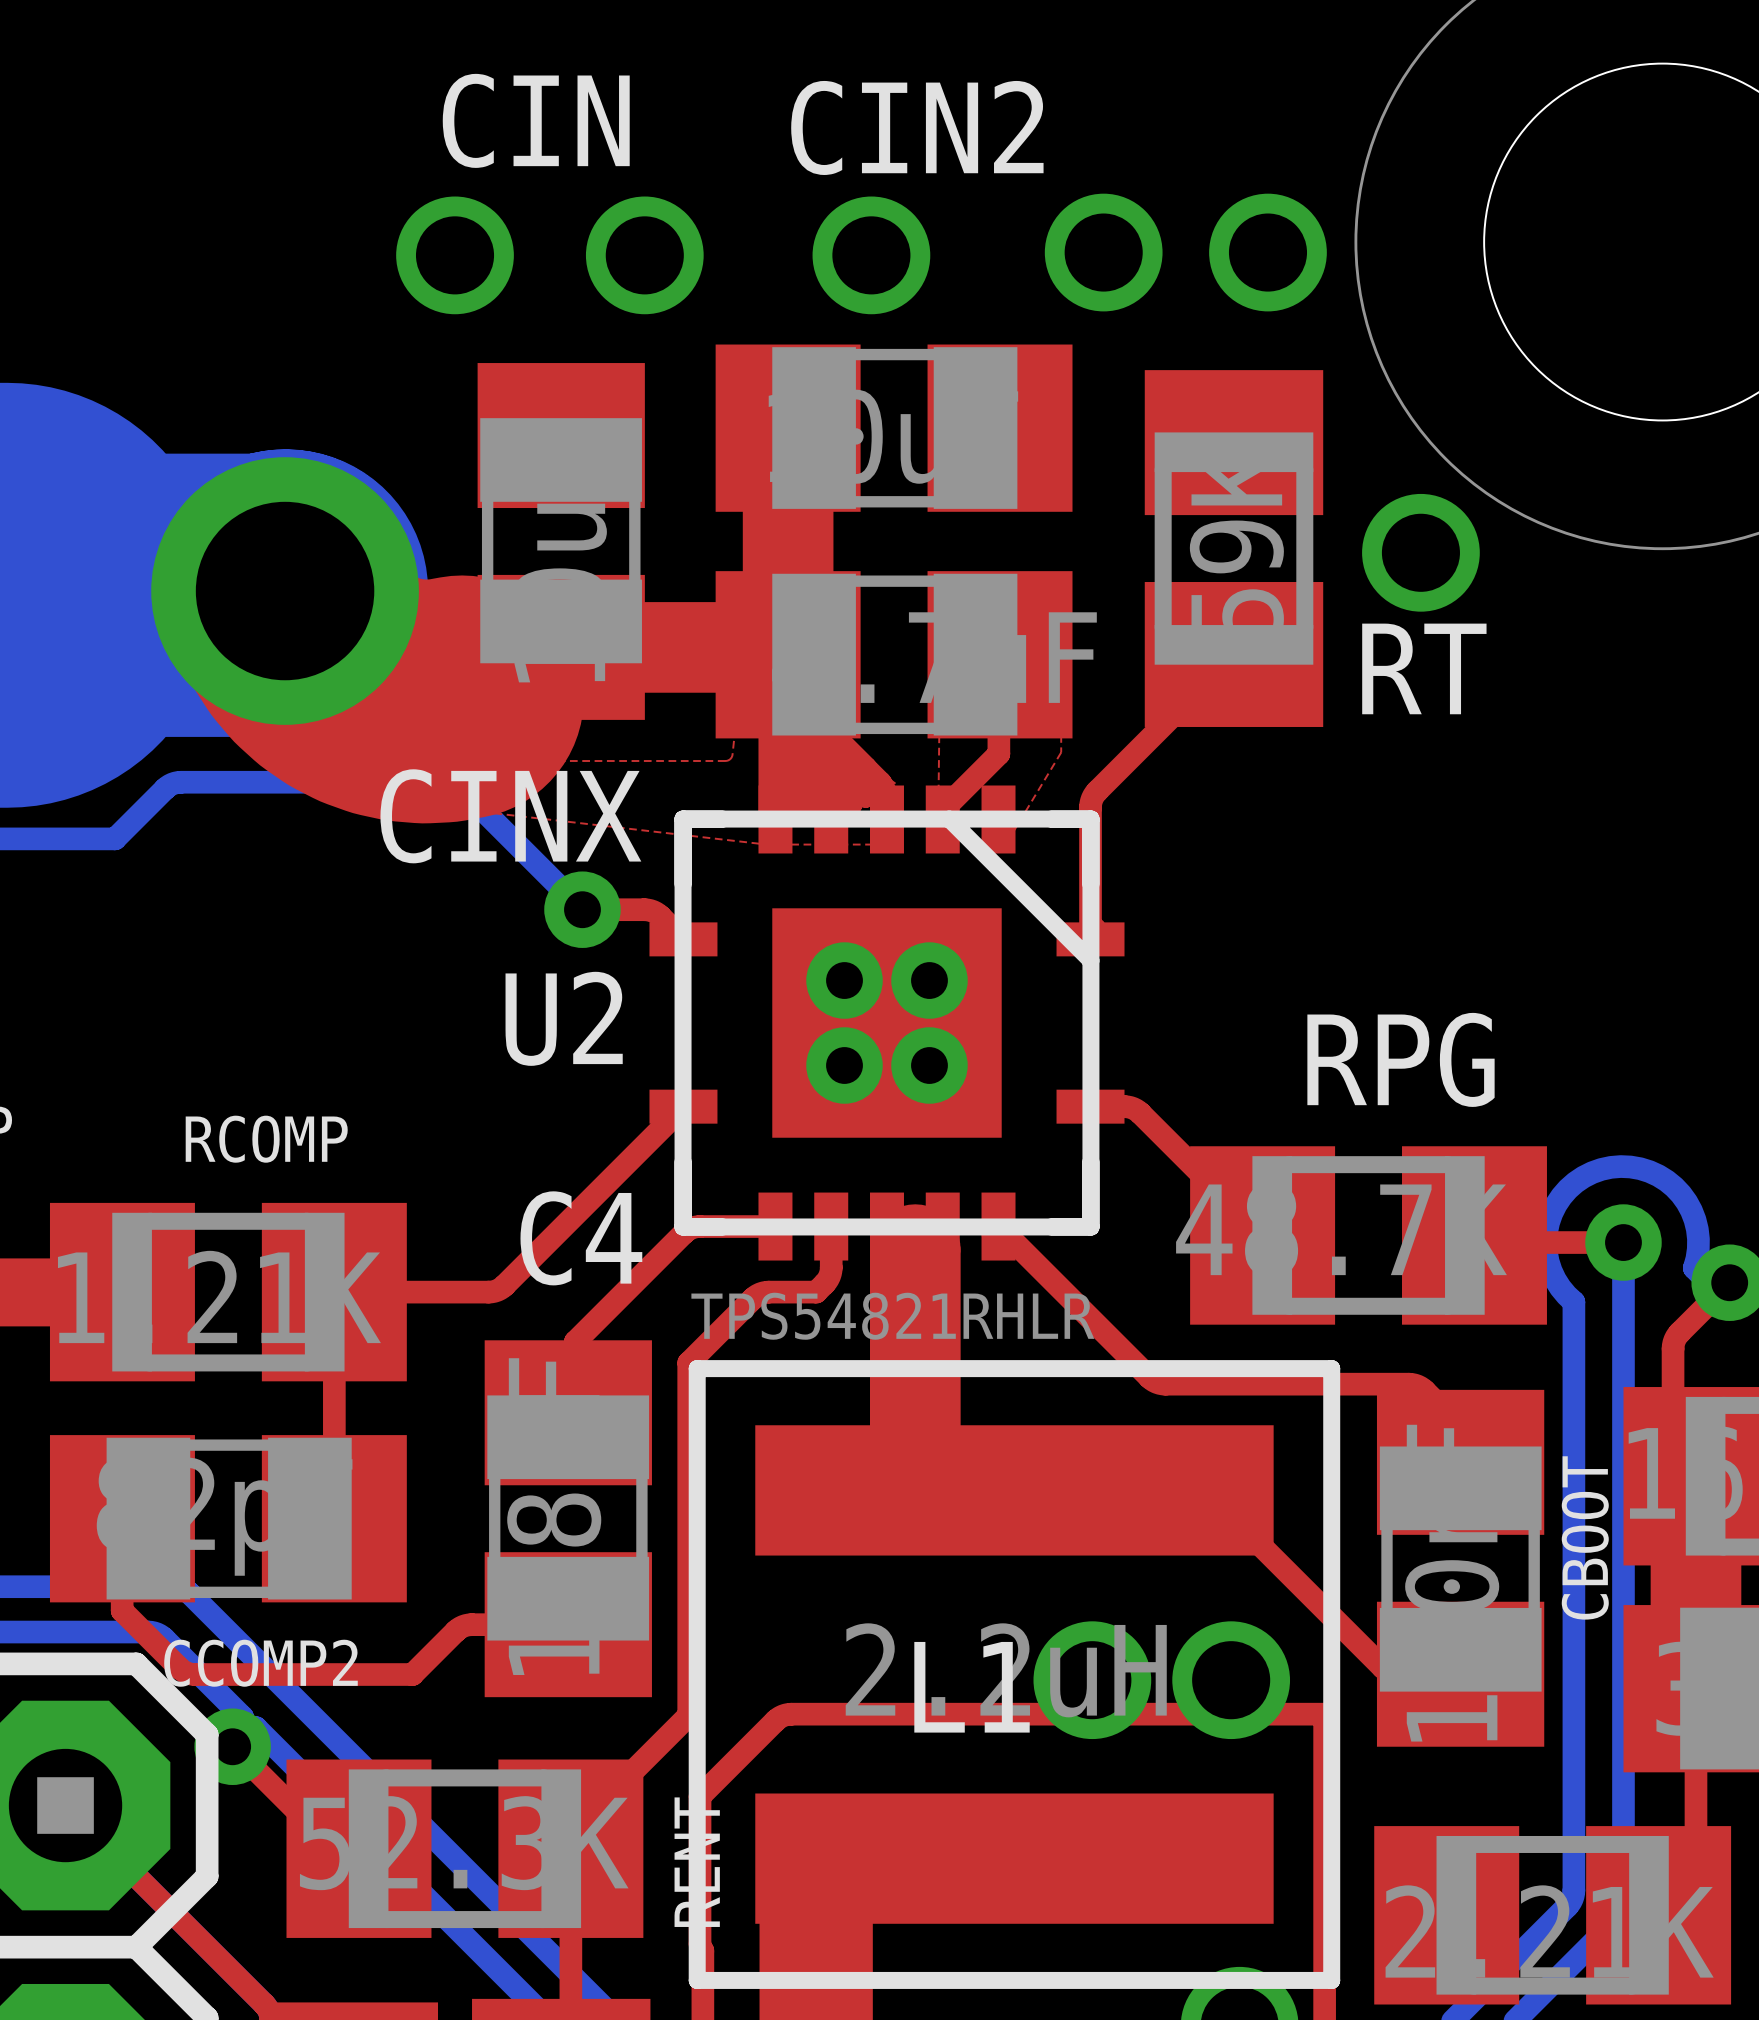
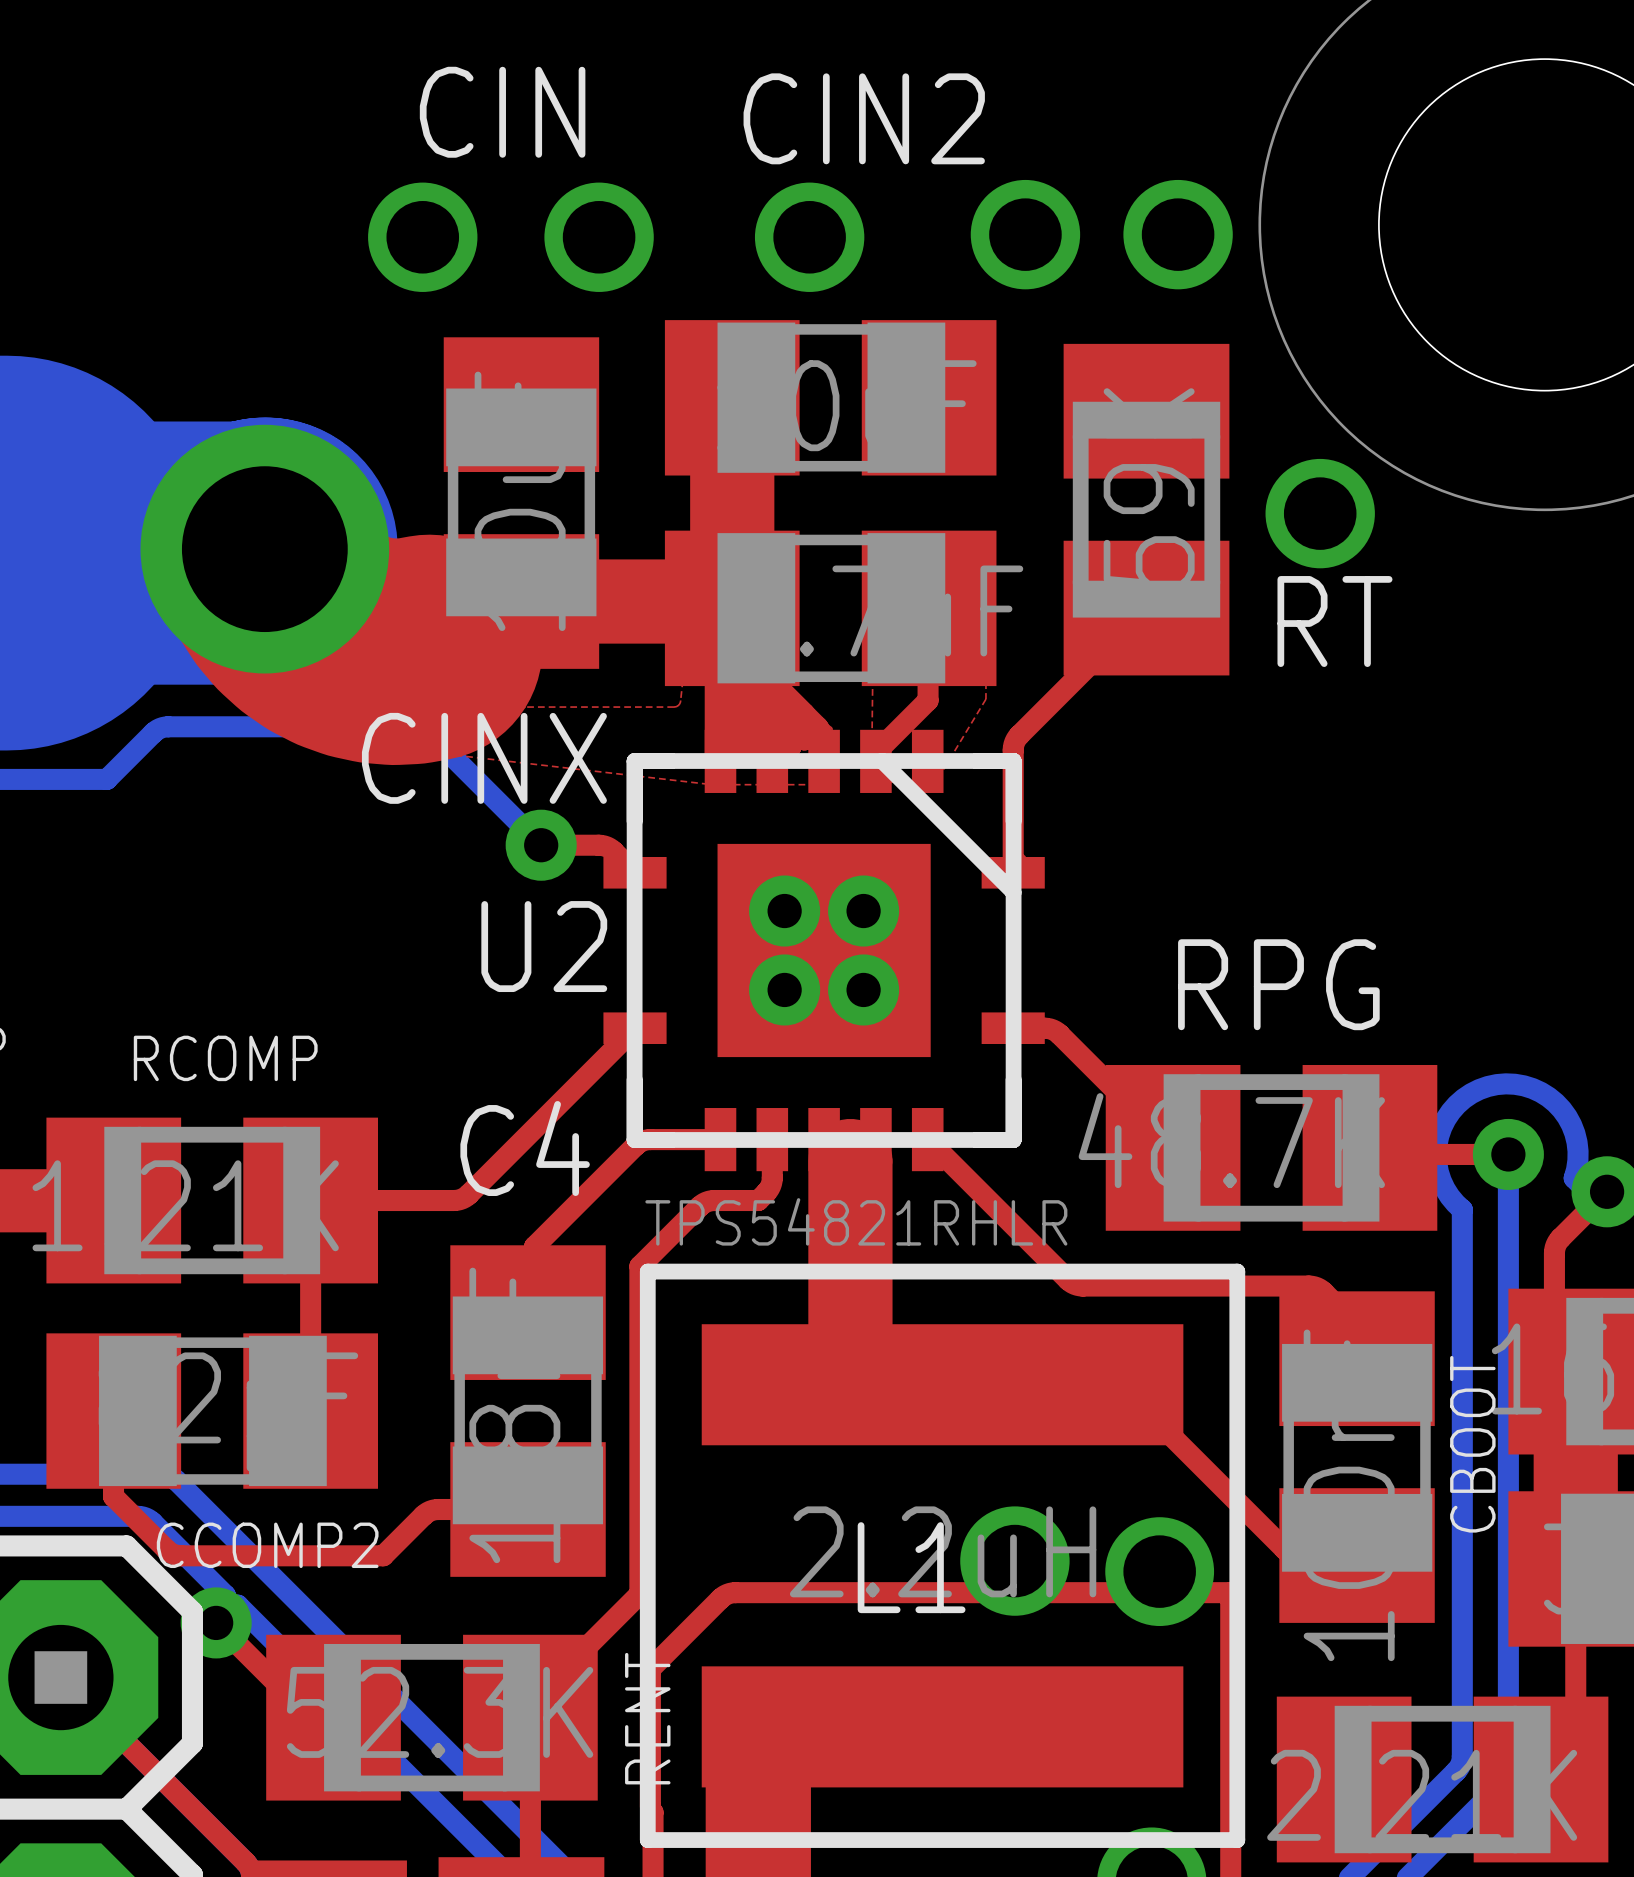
via position: (1231, 1680) -> (1159, 1571)

